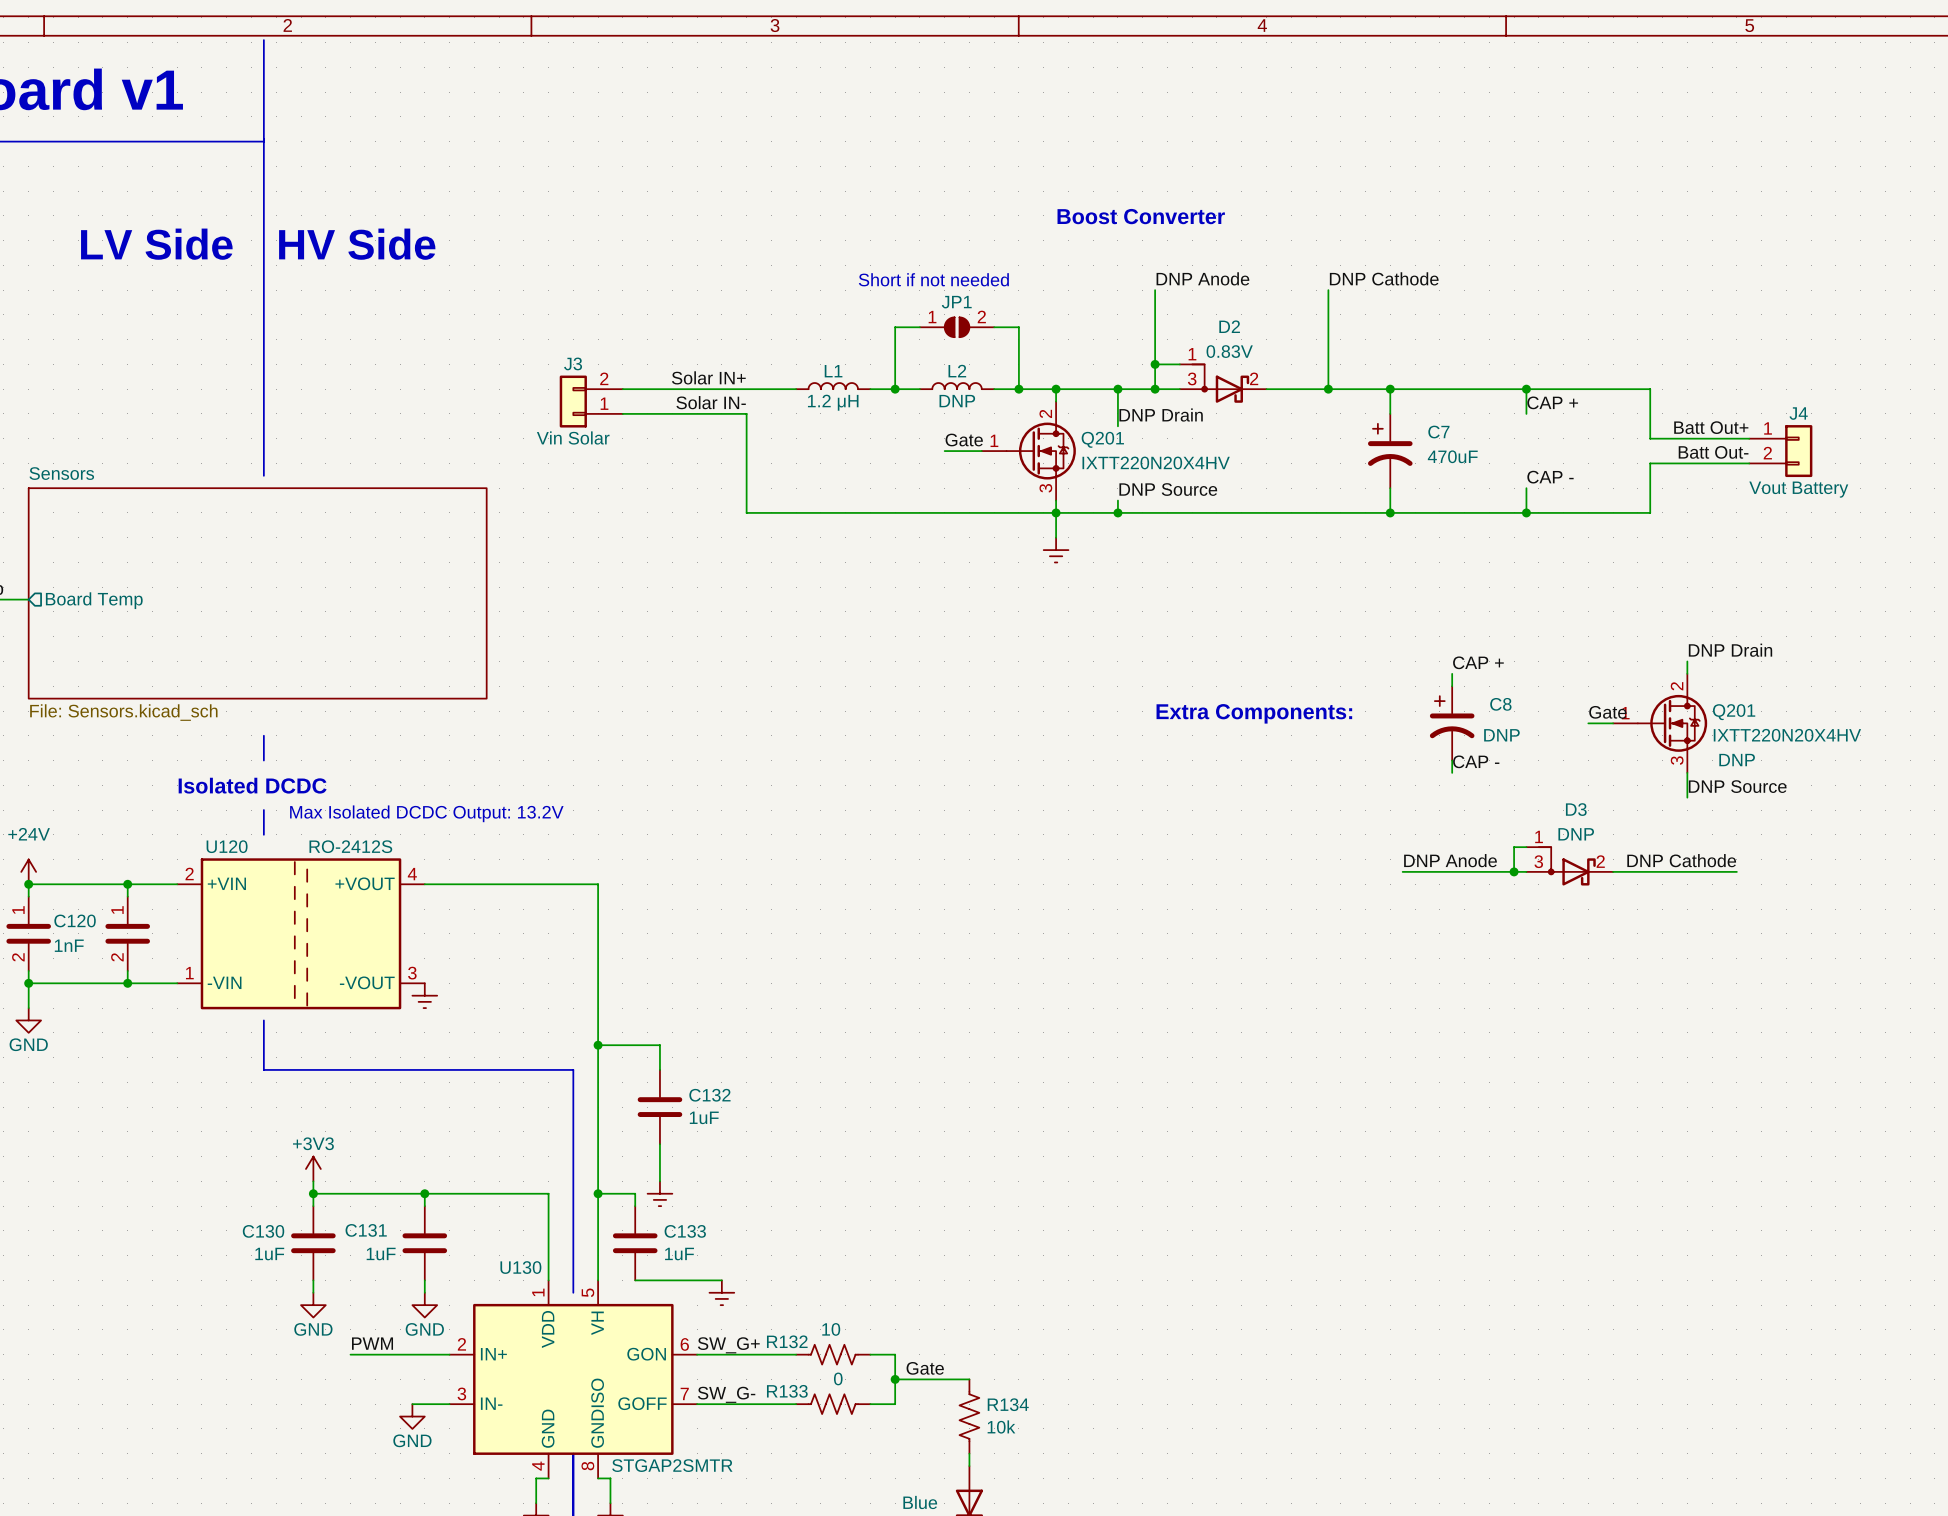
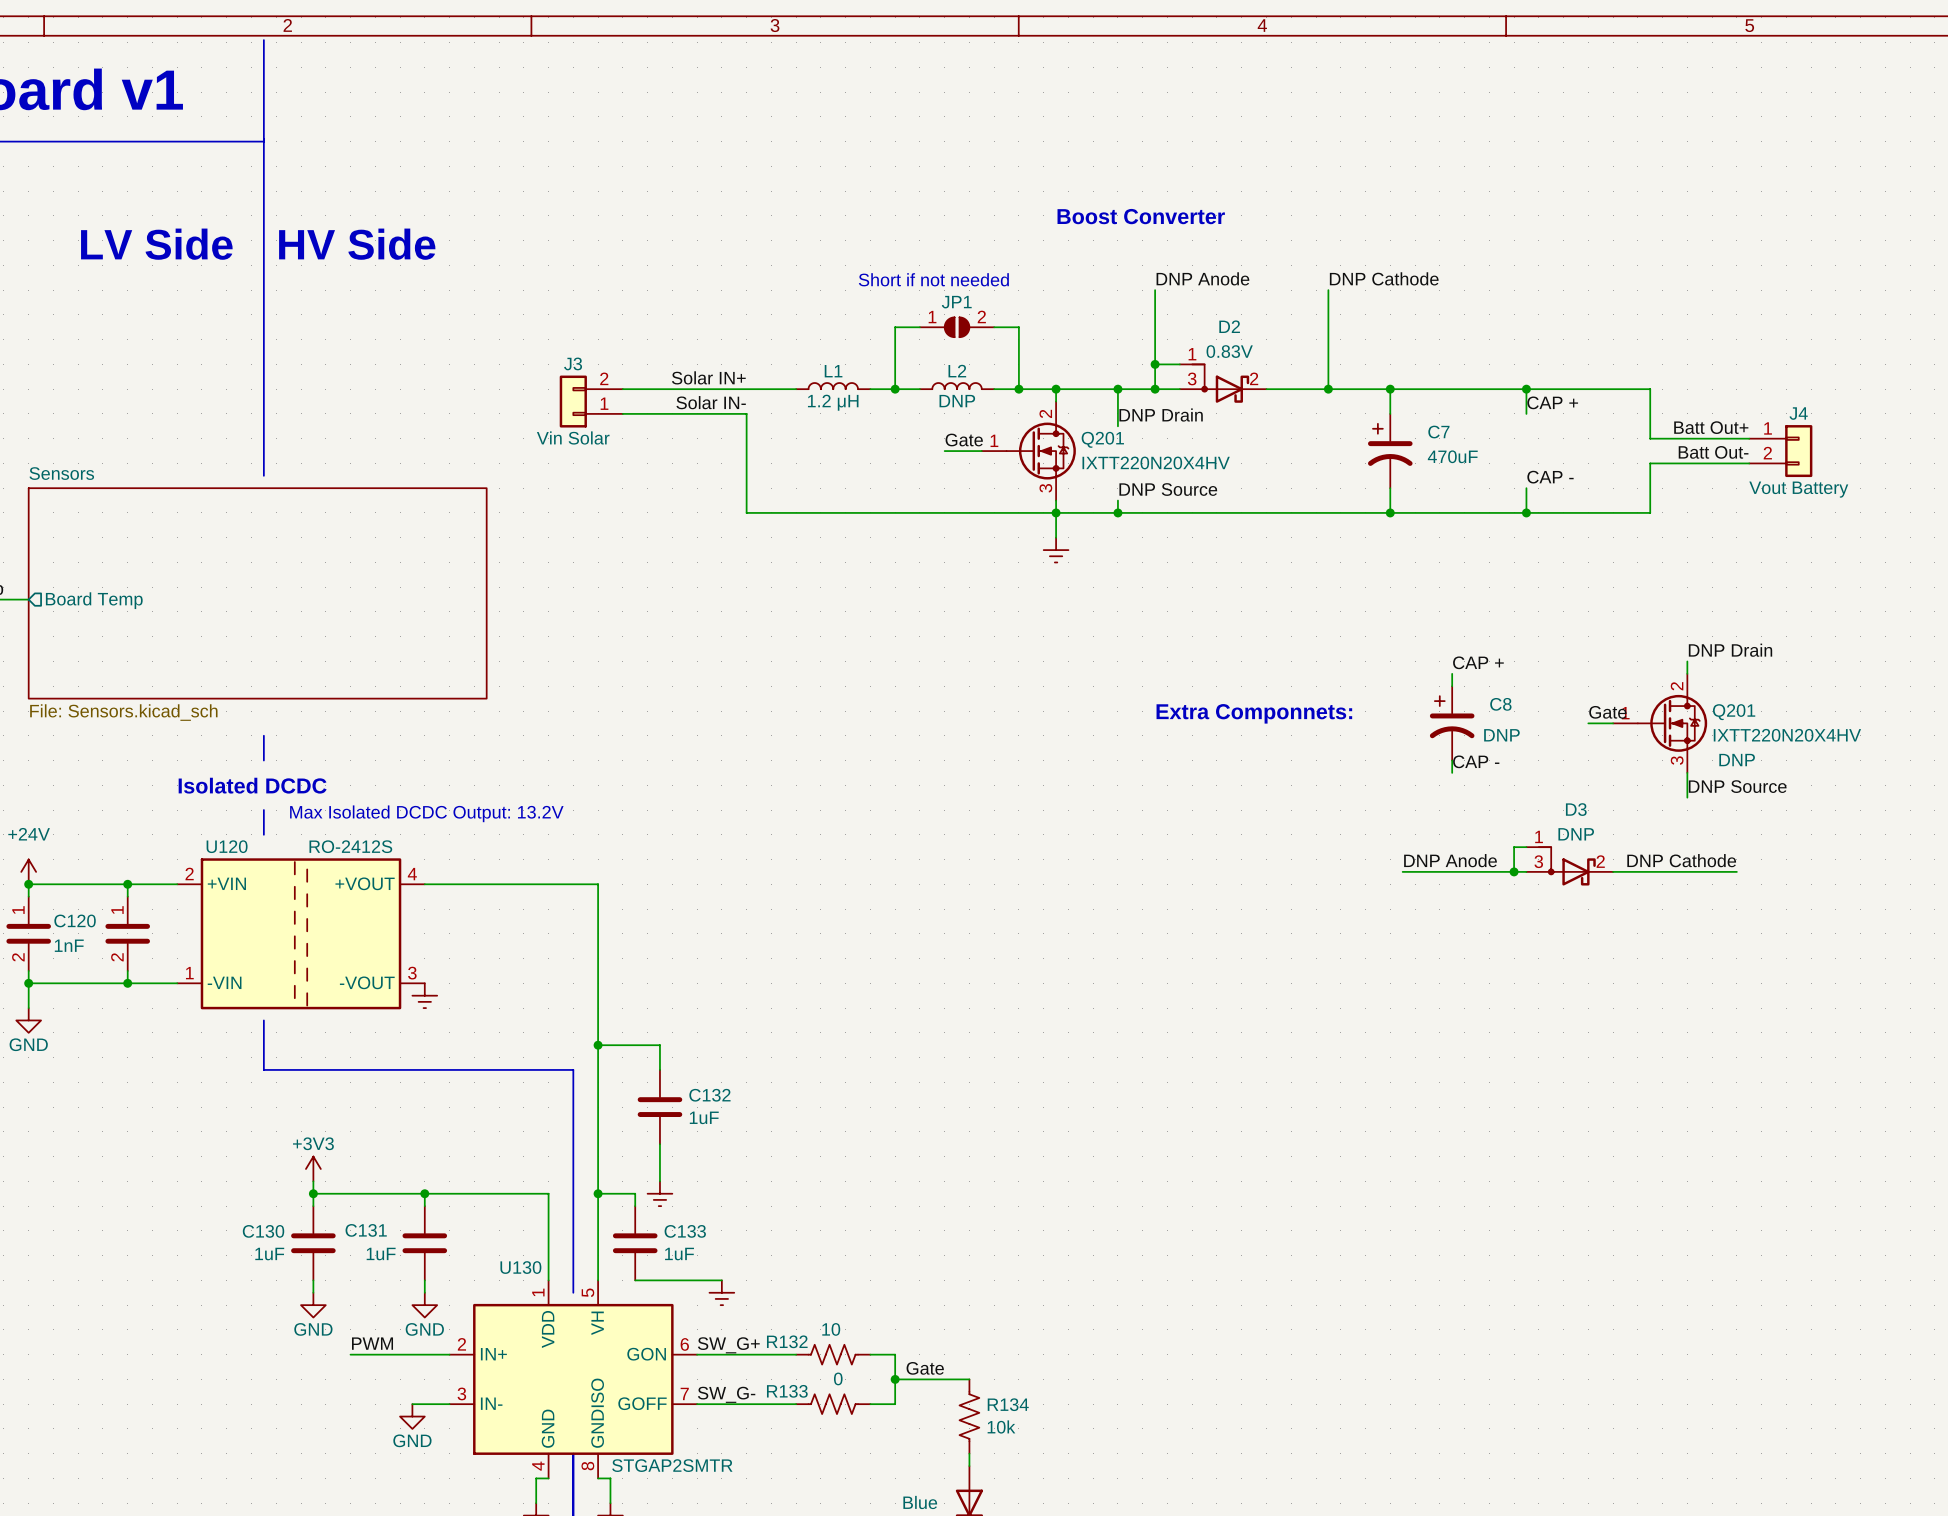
text: Extra Components: (1254, 713) -> Extra Componnets: (1254, 713)

